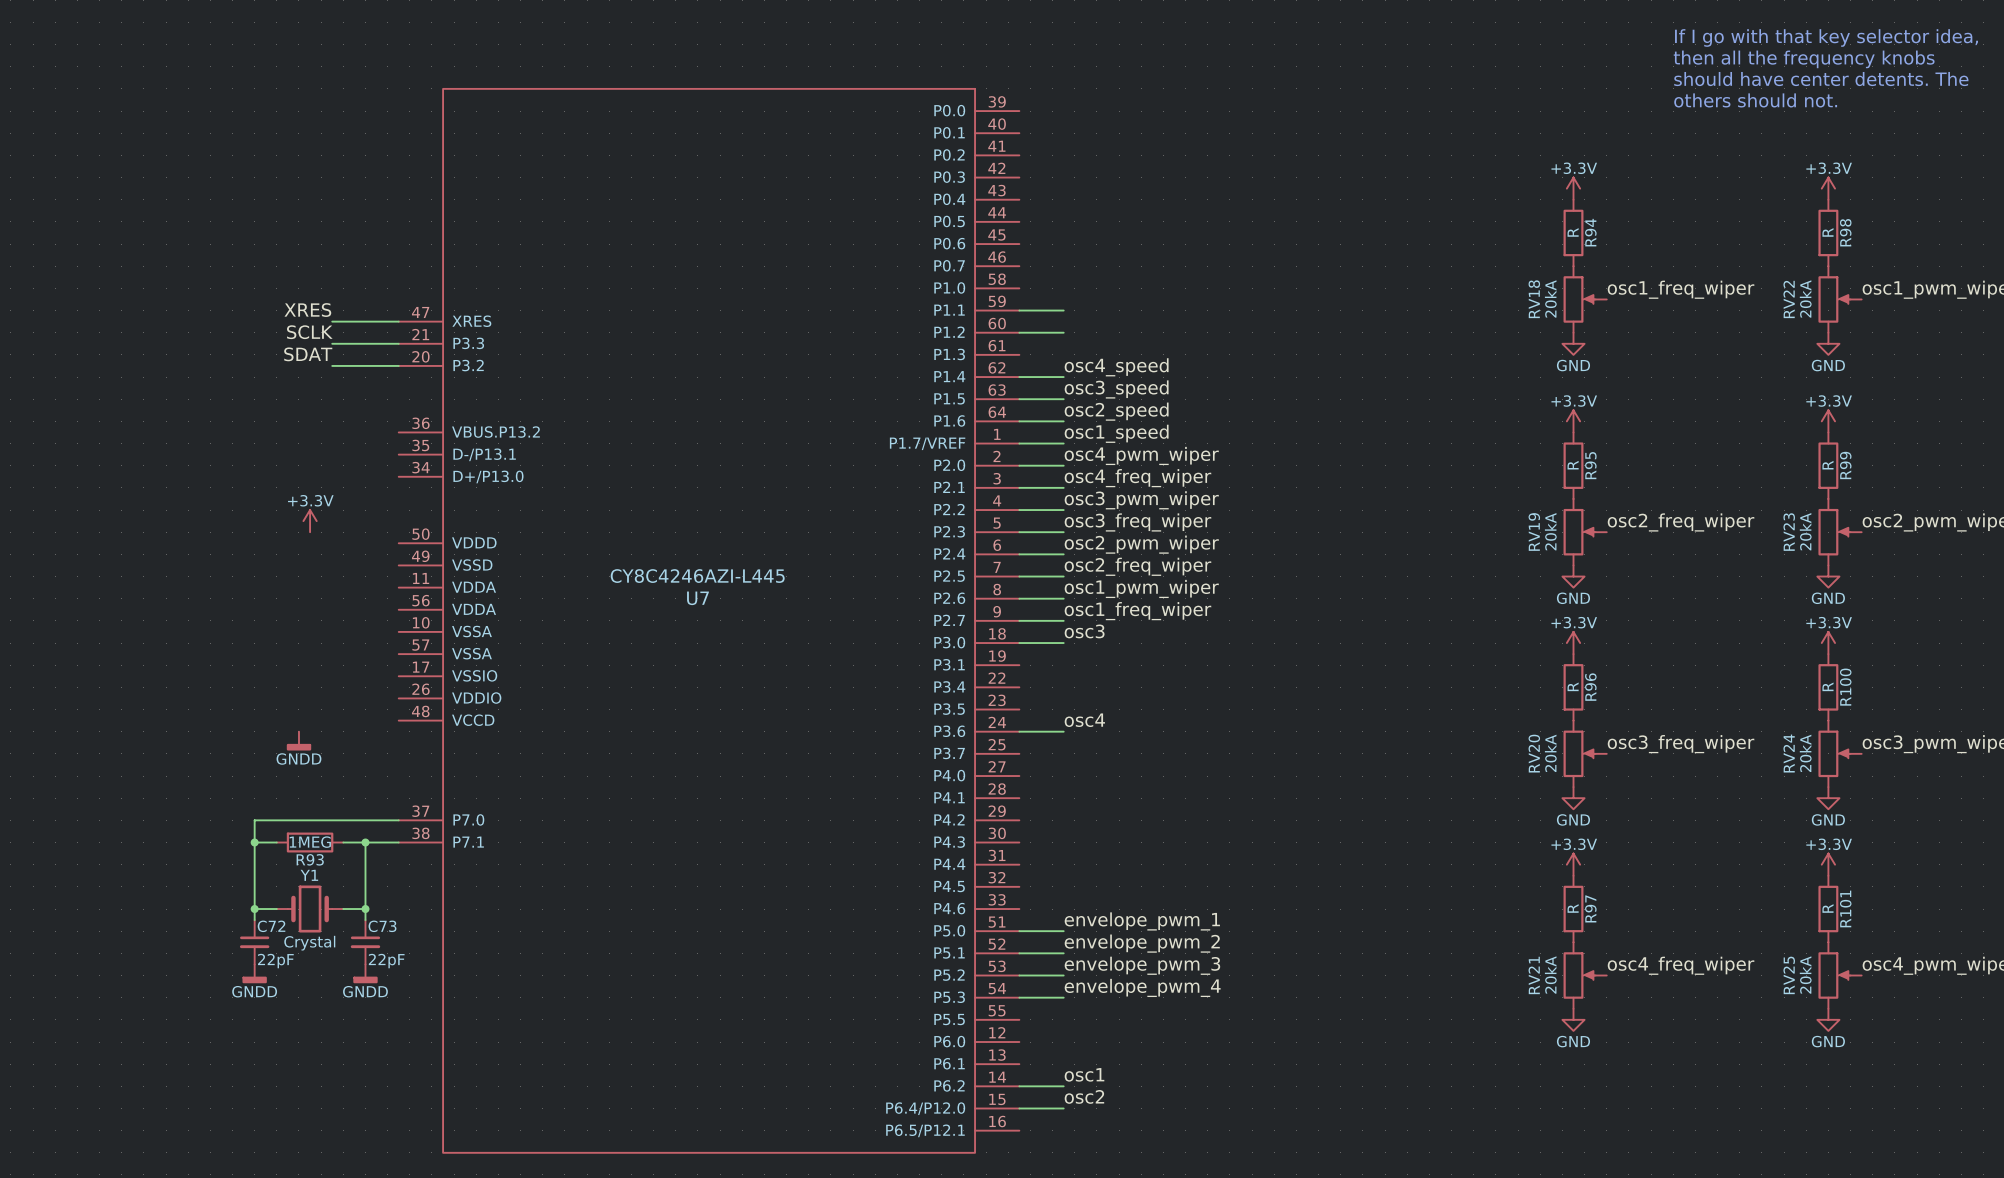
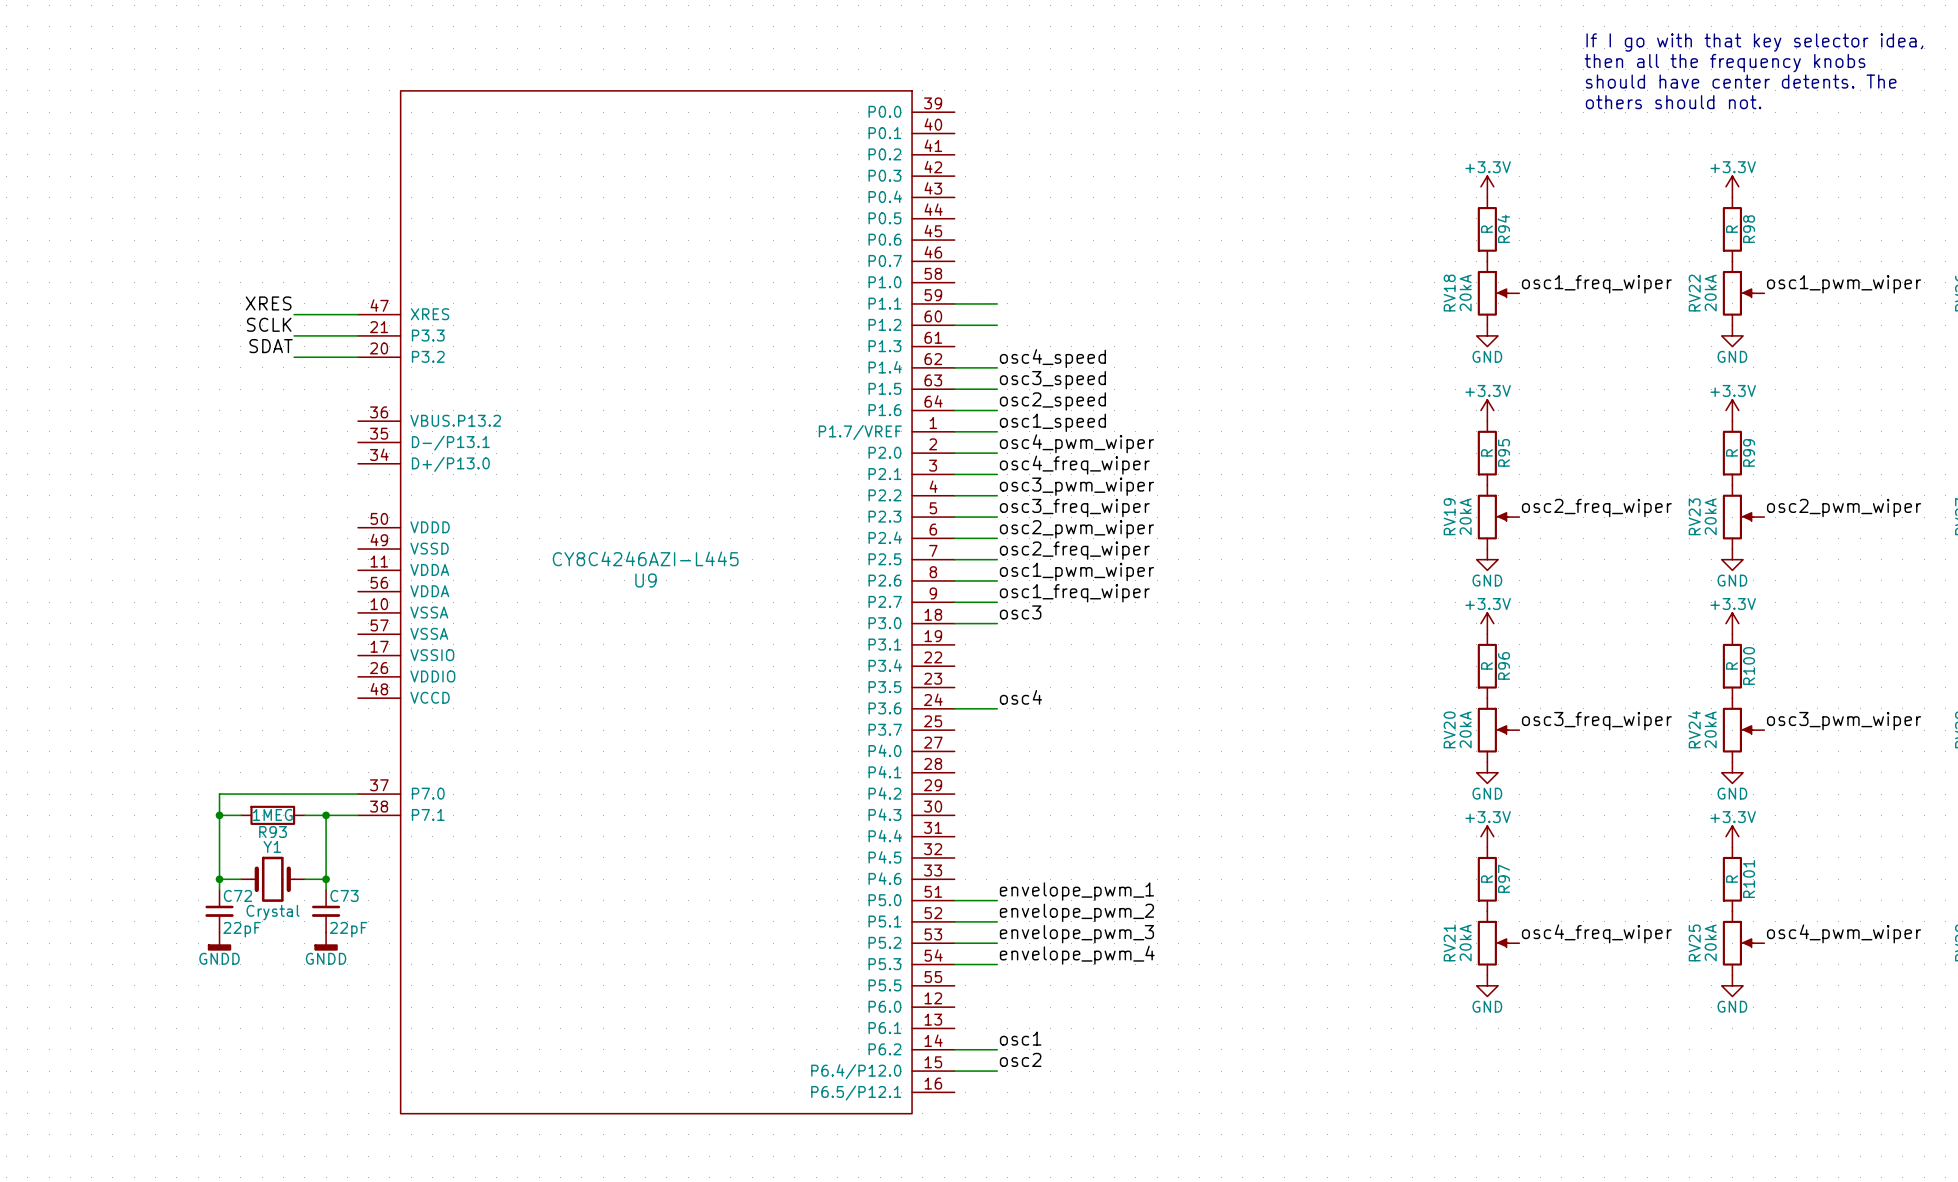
power symbol: +3.3V (310, 521) -> none
U7 name: U7 (697, 598) -> U9 (645, 580)
power symbol: GNDD (298, 741) -> none

